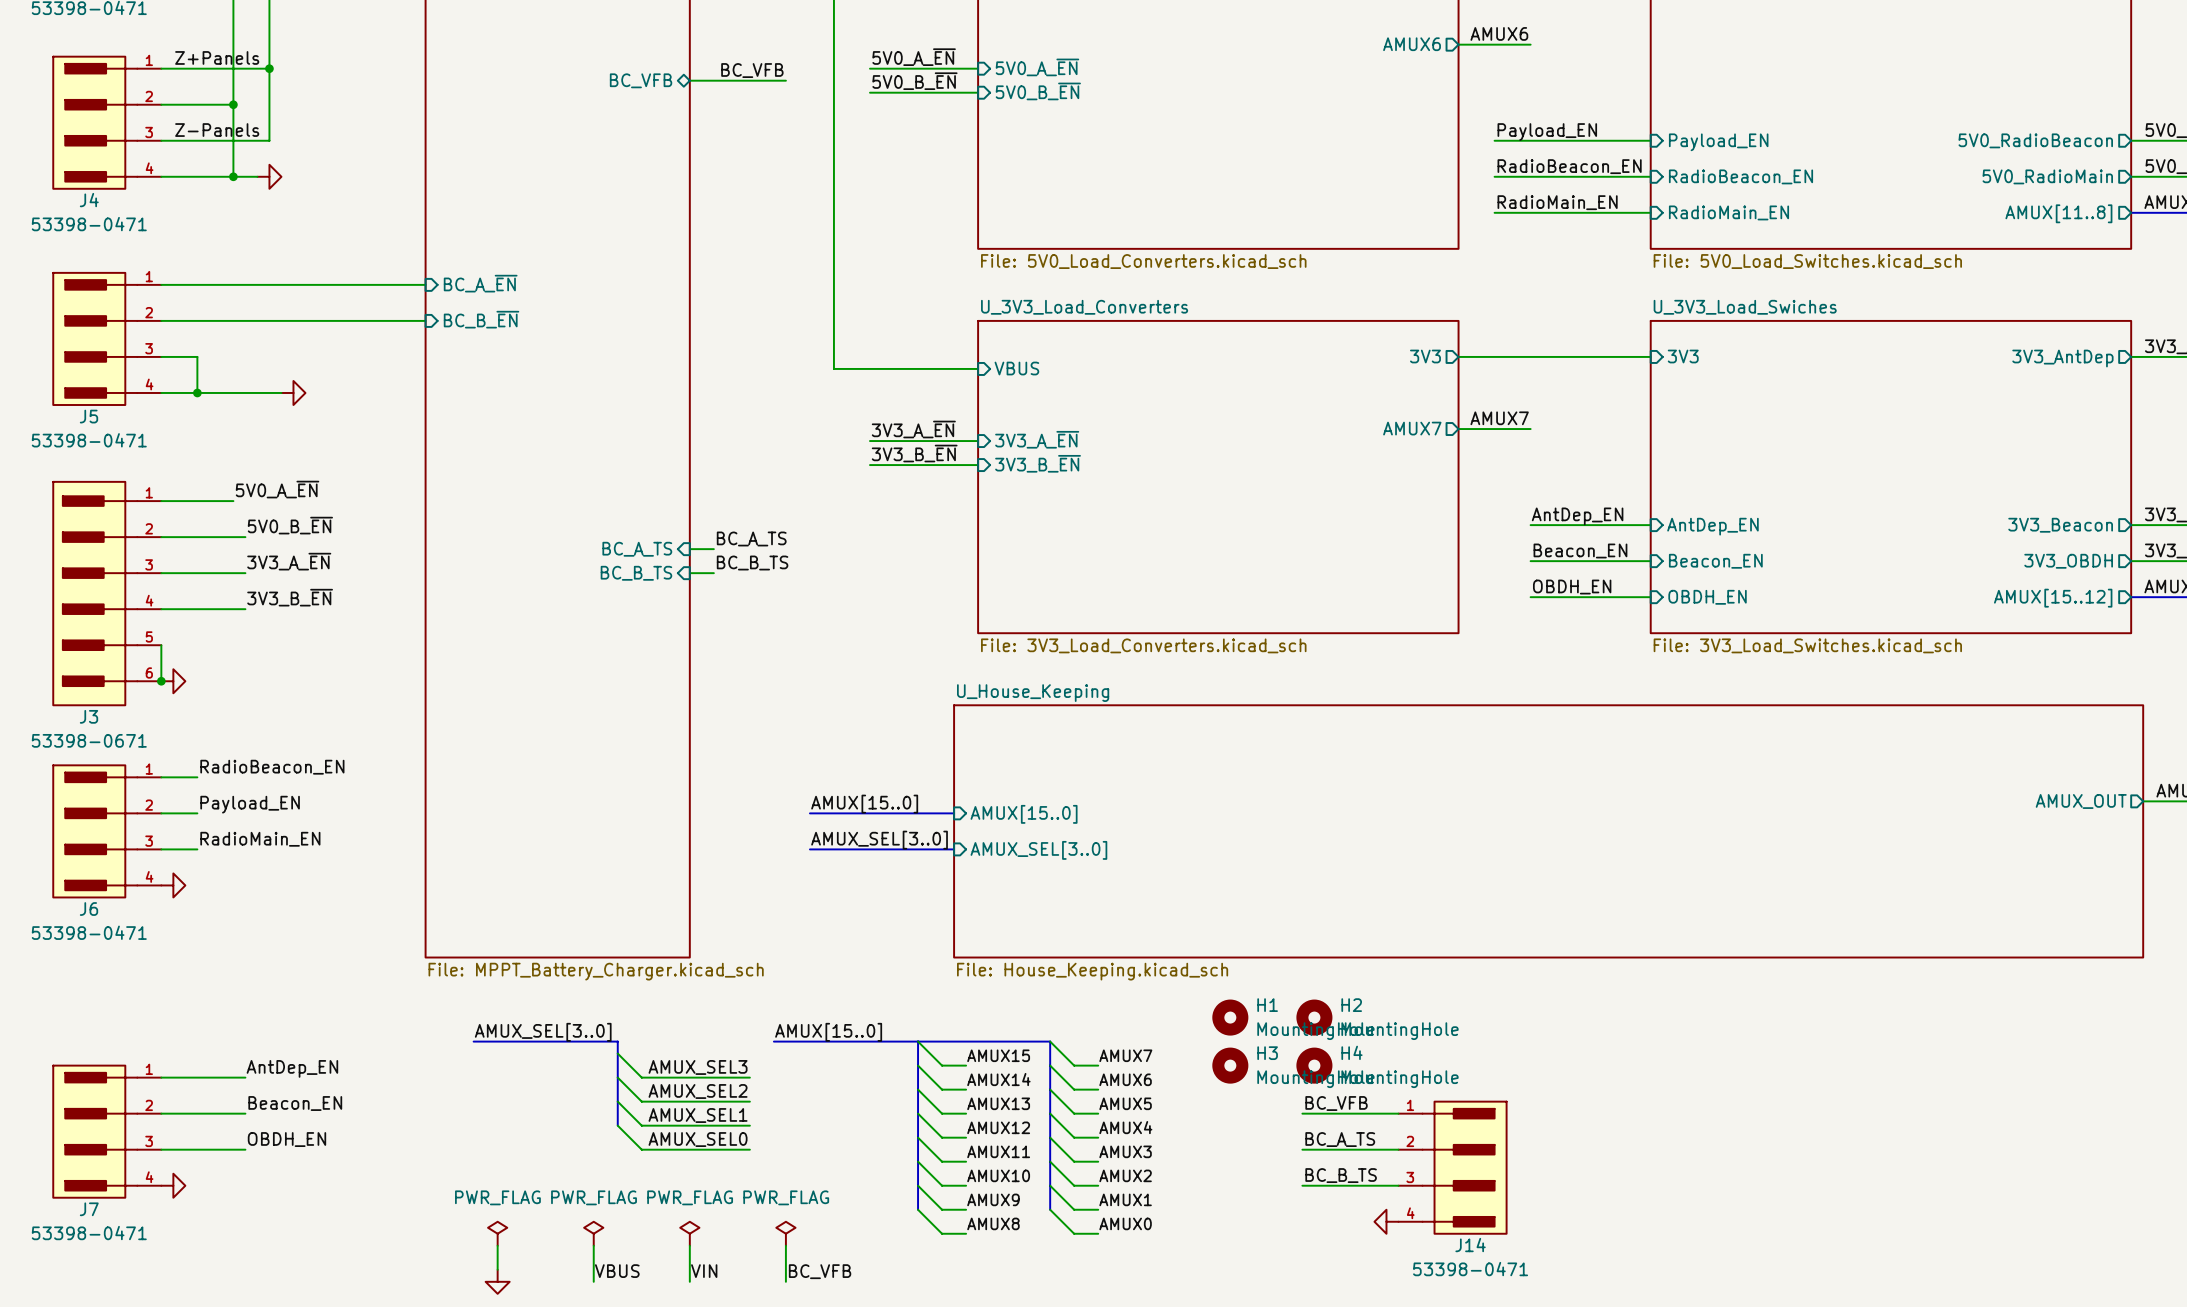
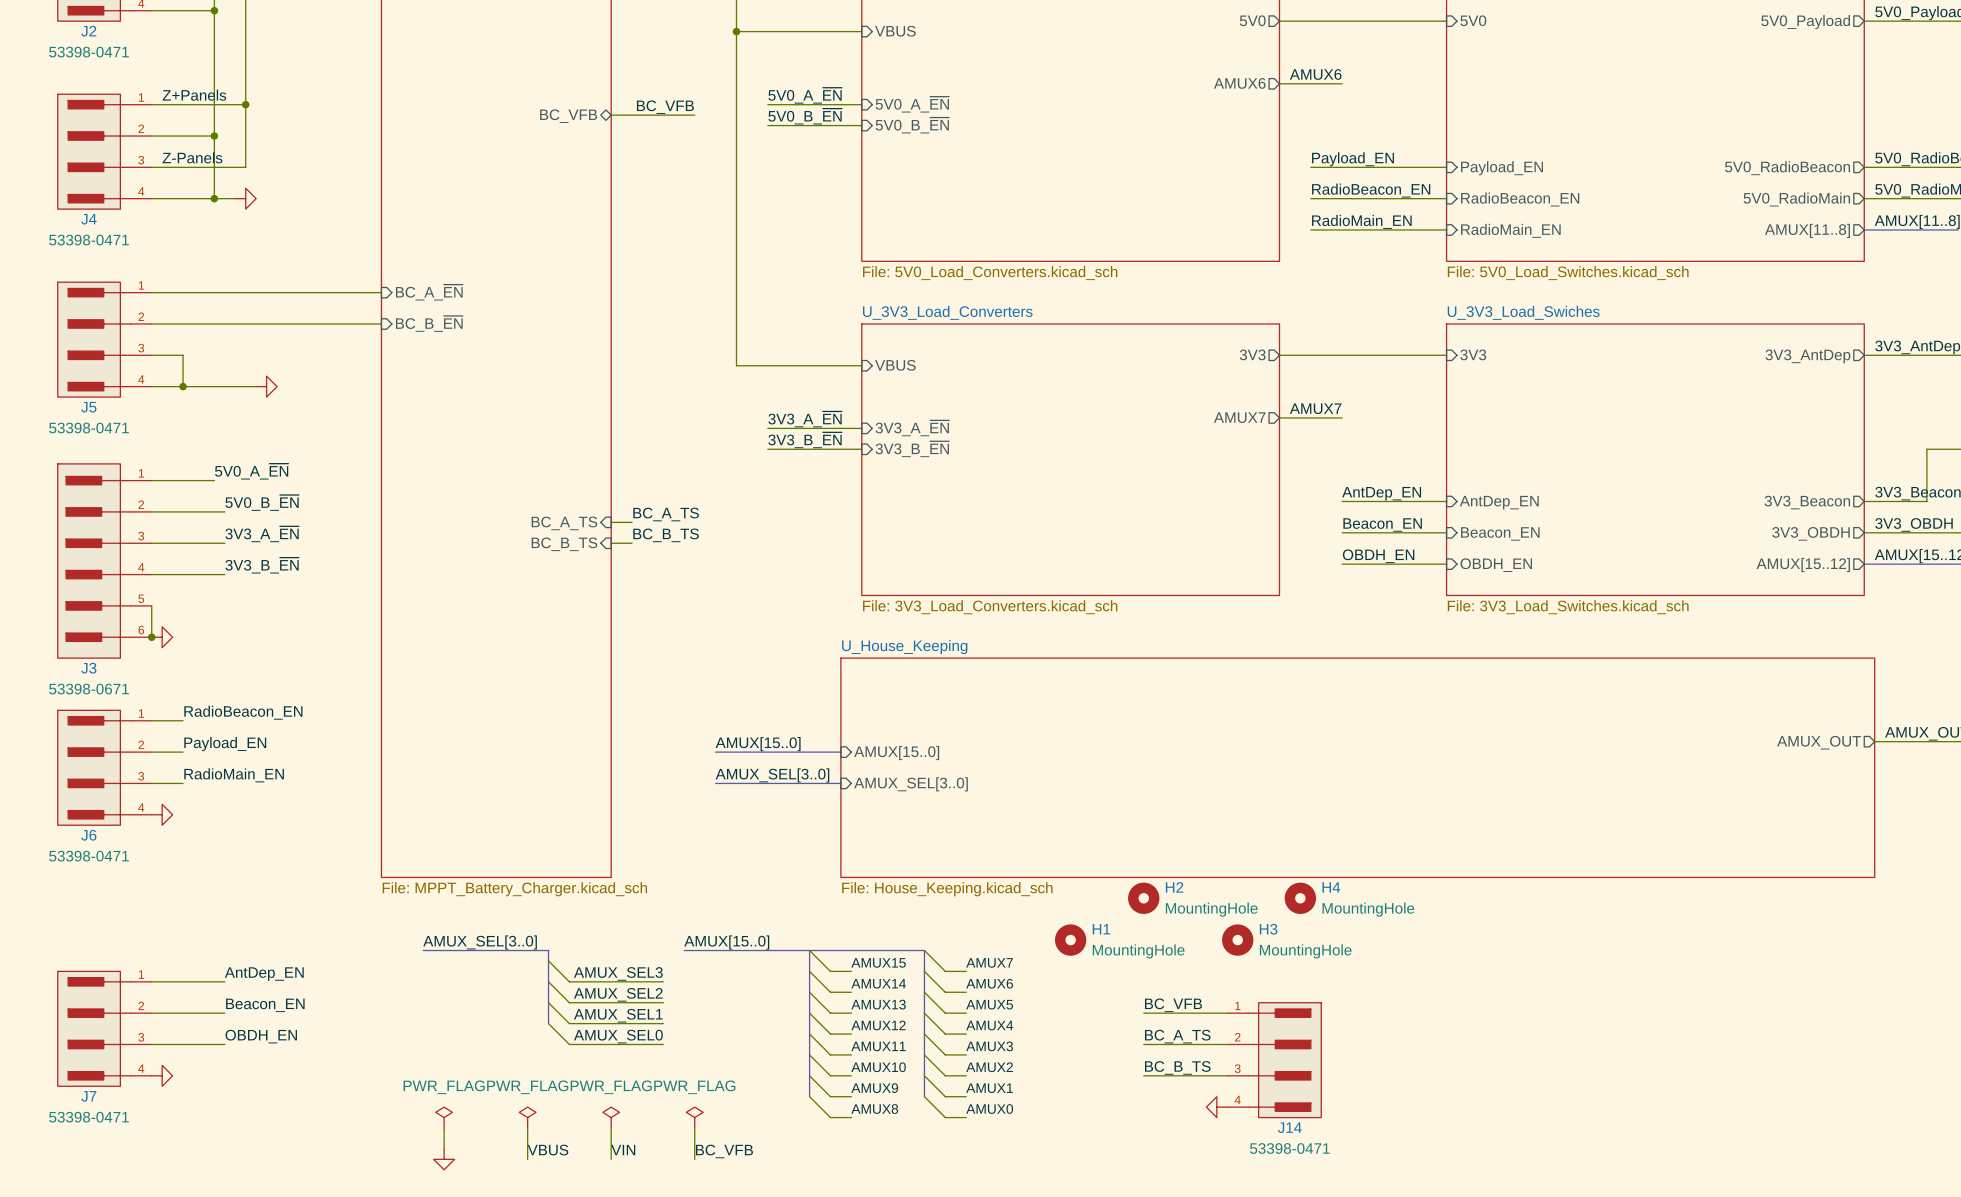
H1 position: (1230, 1017) -> (1070, 940)
H2 position: (1314, 1017) -> (1143, 898)
H3 position: (1230, 1065) -> (1237, 940)
H4 position: (1314, 1065) -> (1300, 898)

